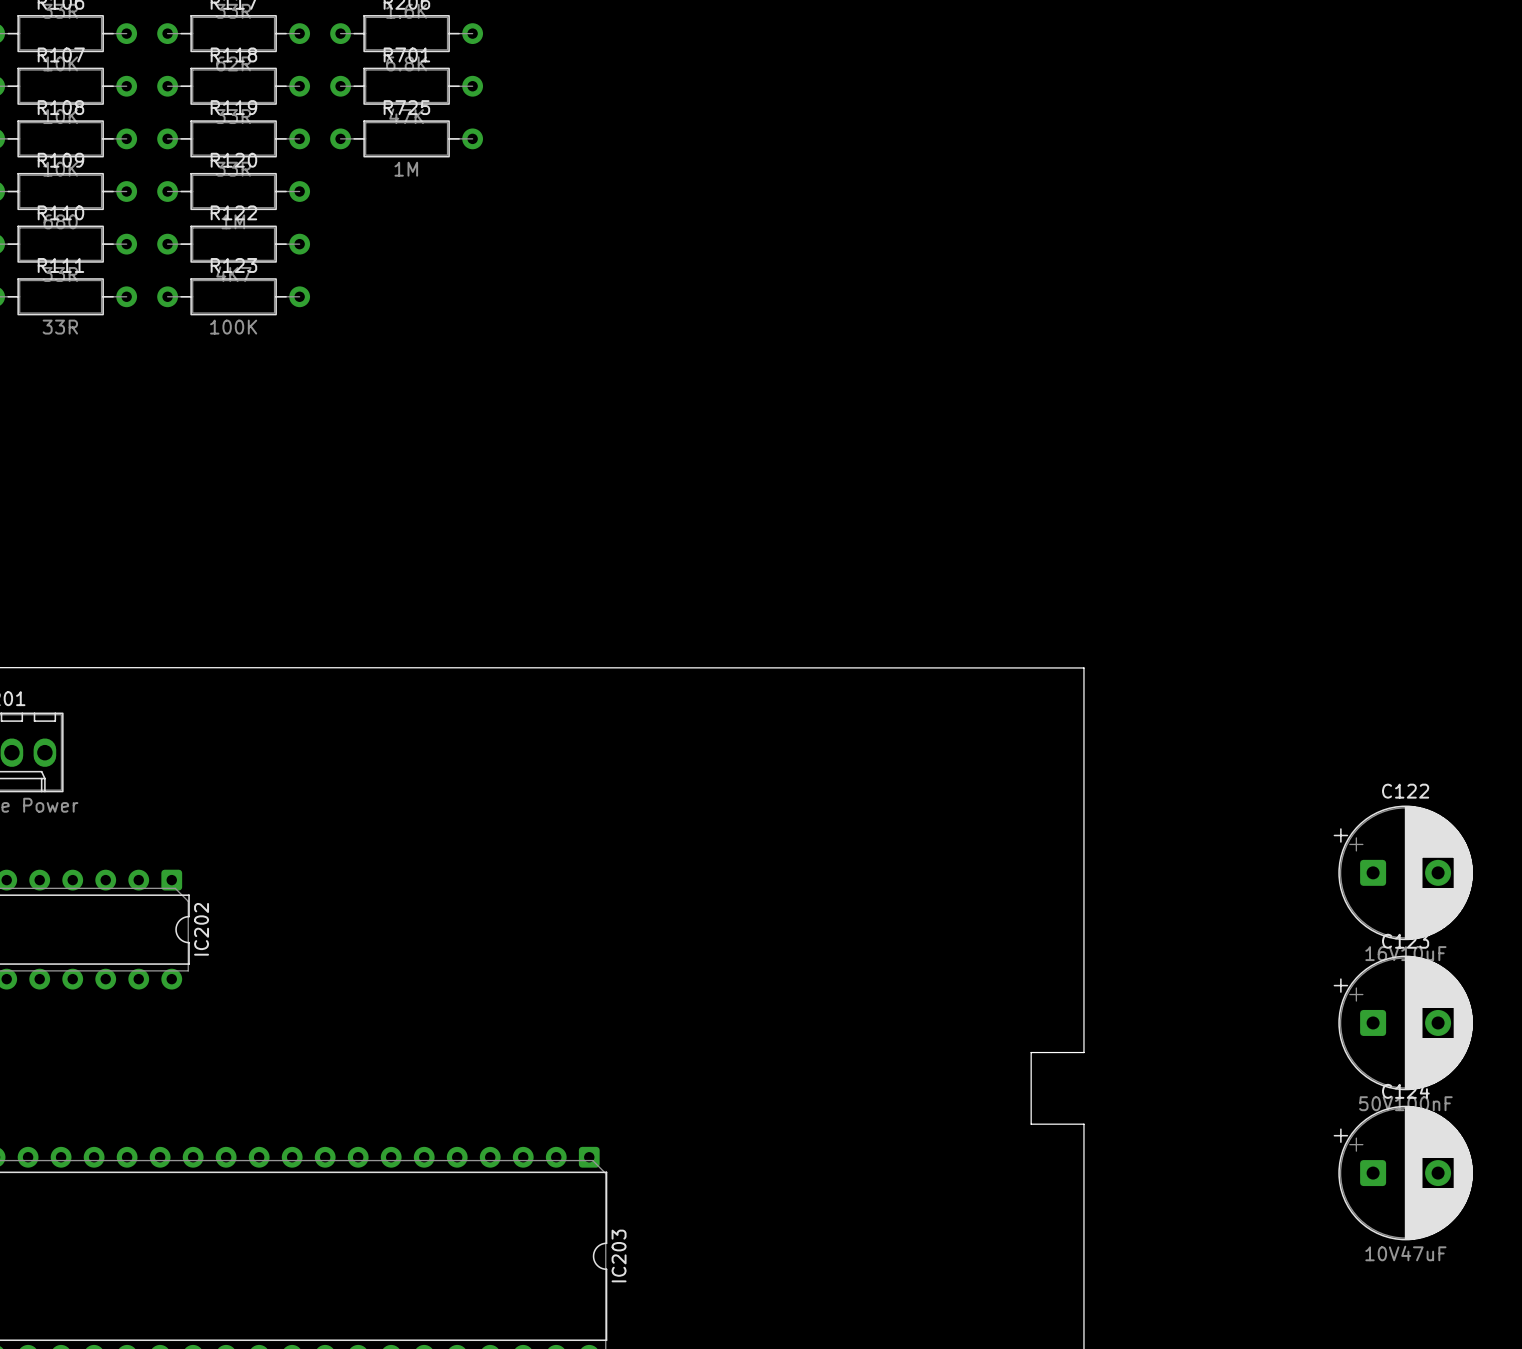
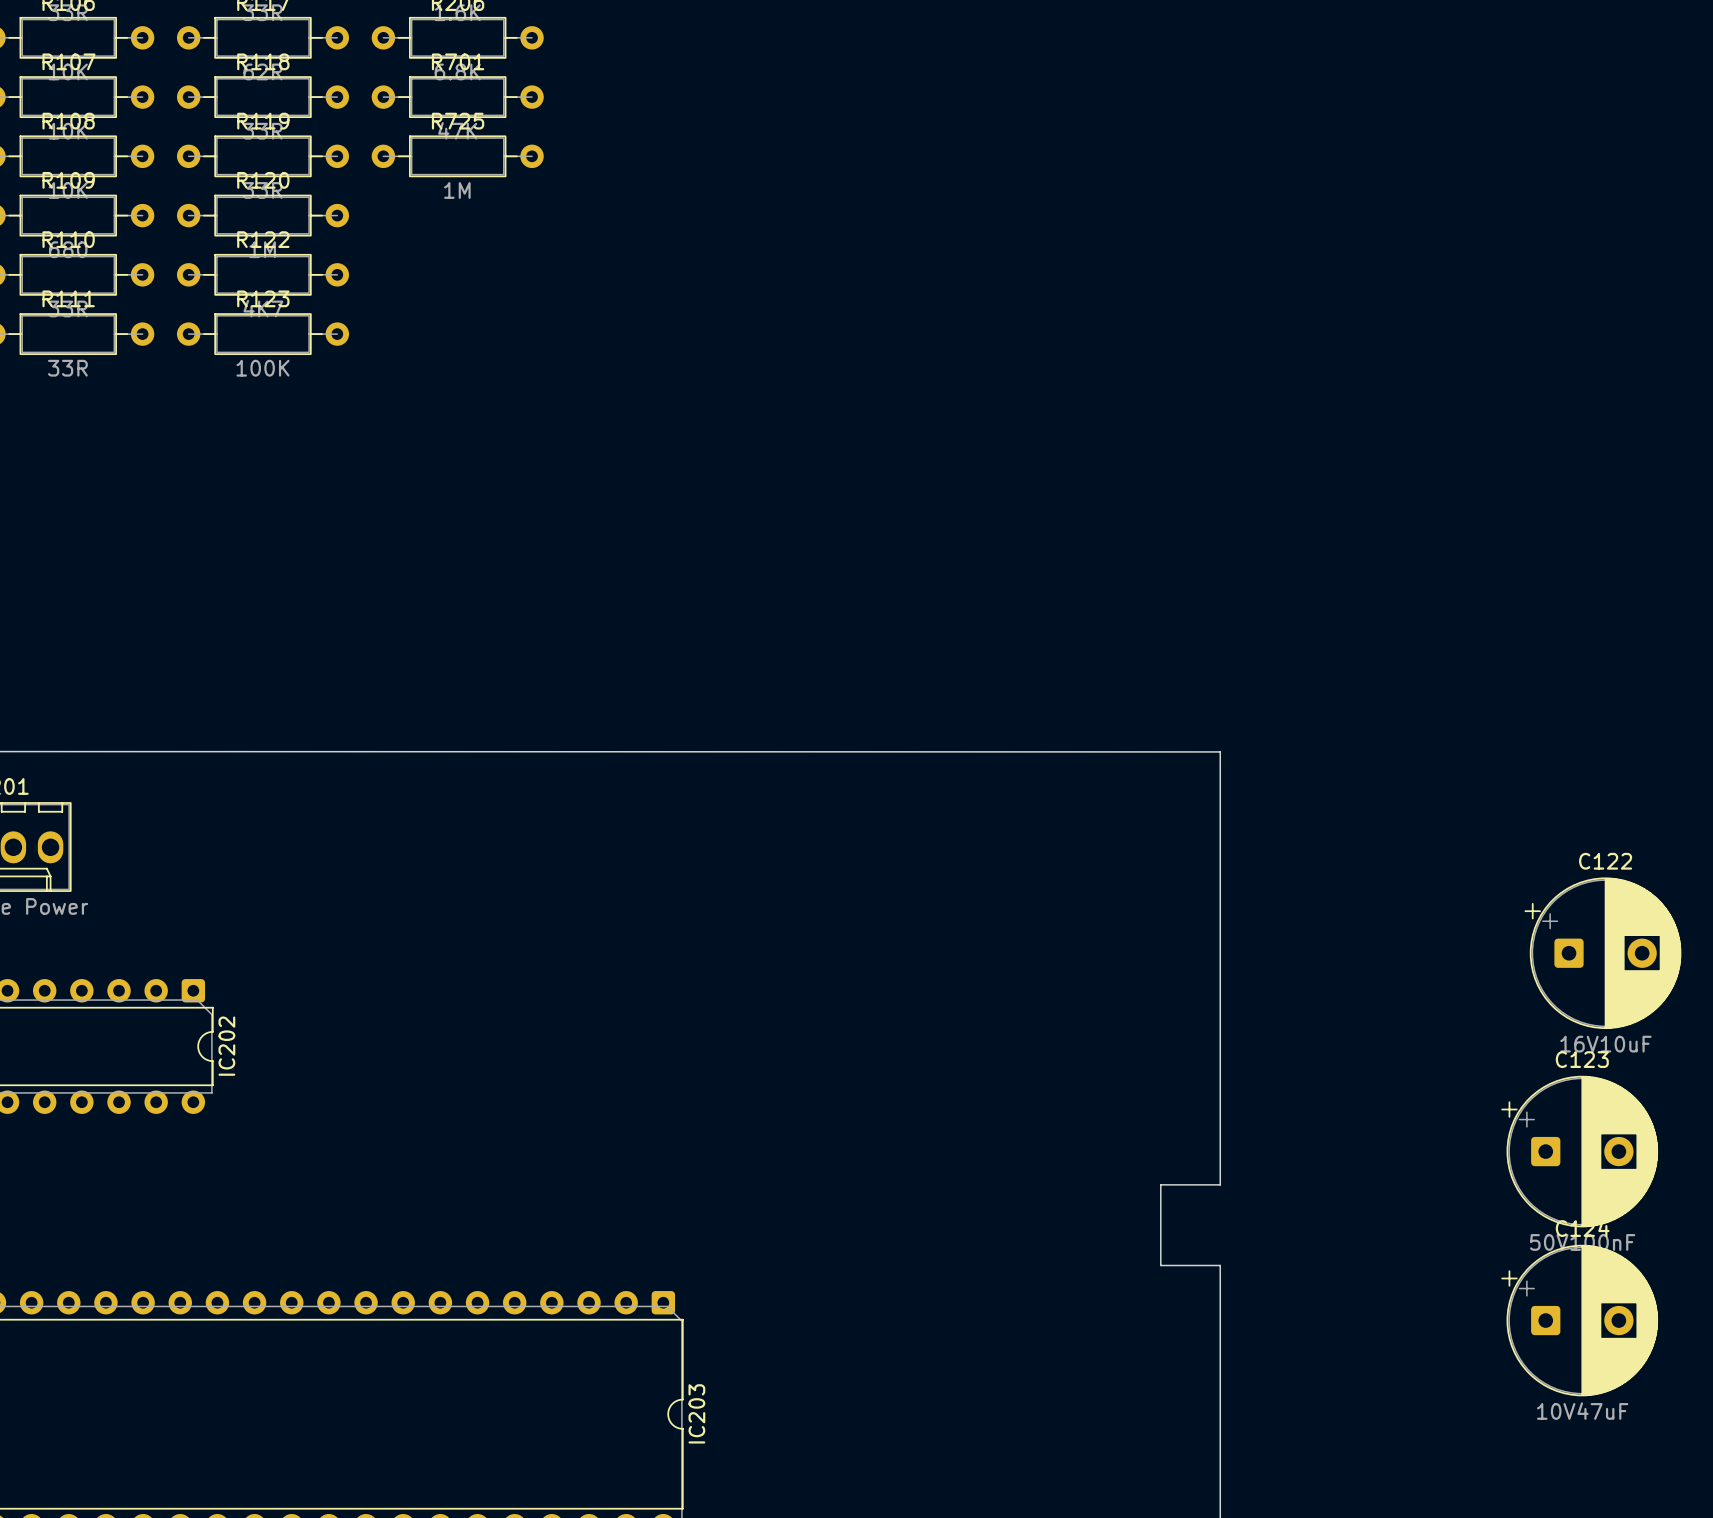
C122 position: (1403, 872) -> (1602, 953)

